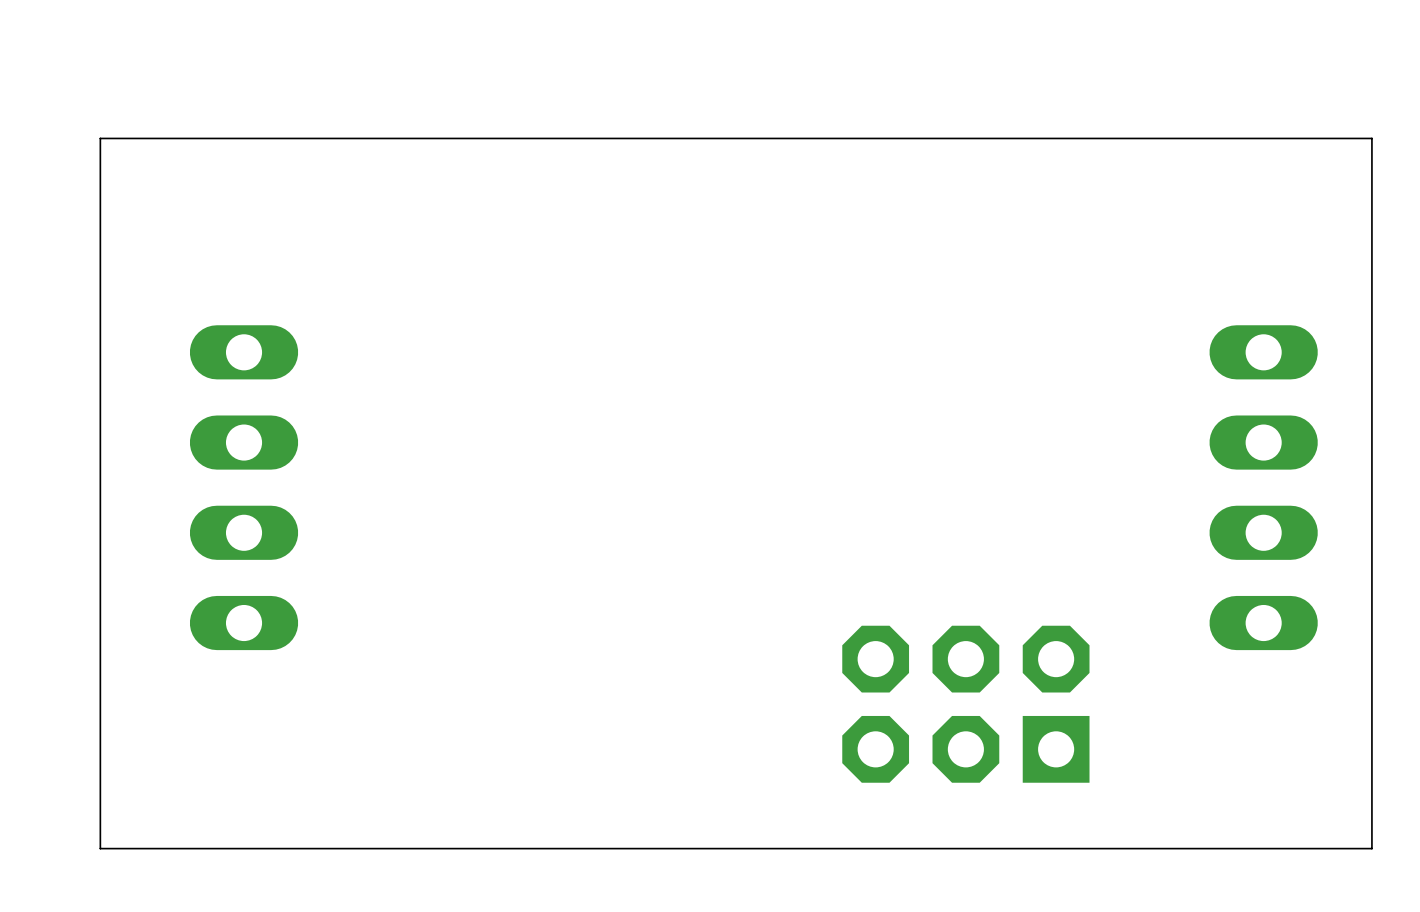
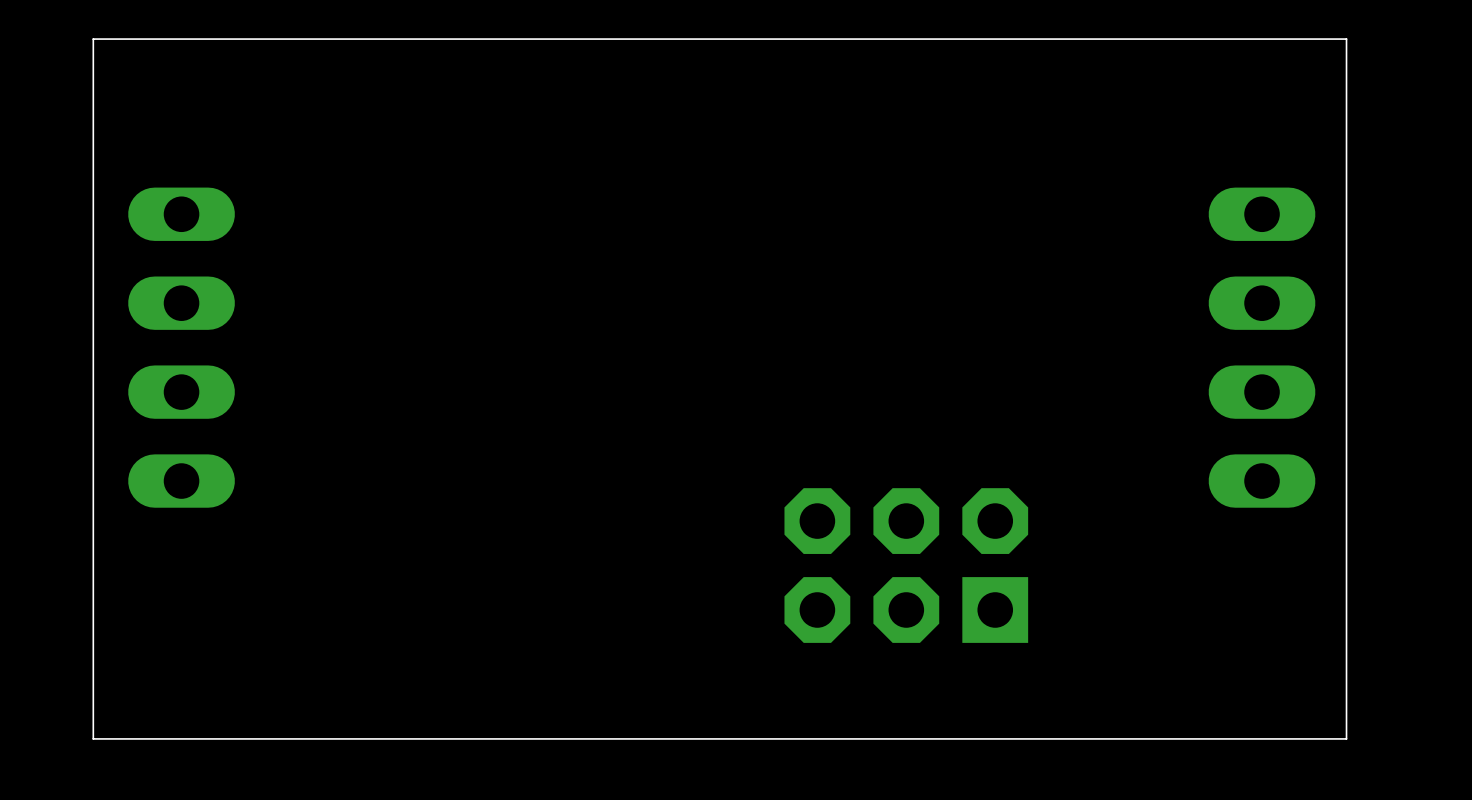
part position: (244, 487) -> (181, 347)
part position: (1263, 487) -> (1262, 347)
part position: (965, 704) -> (906, 565)

